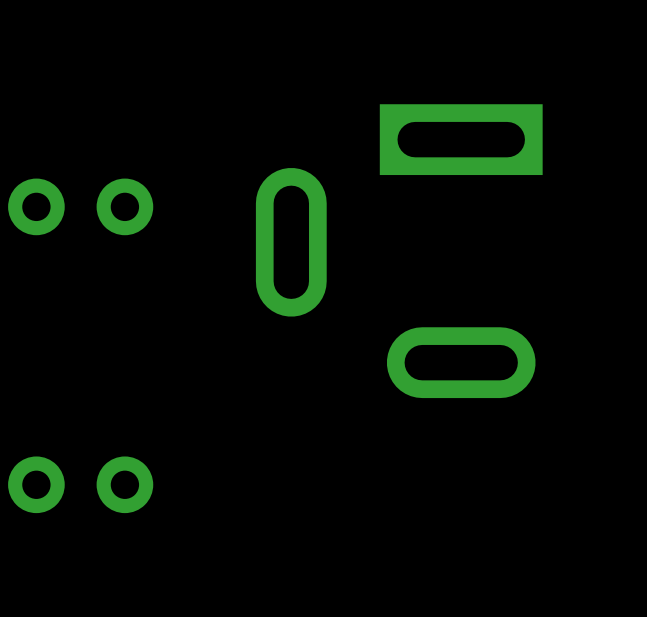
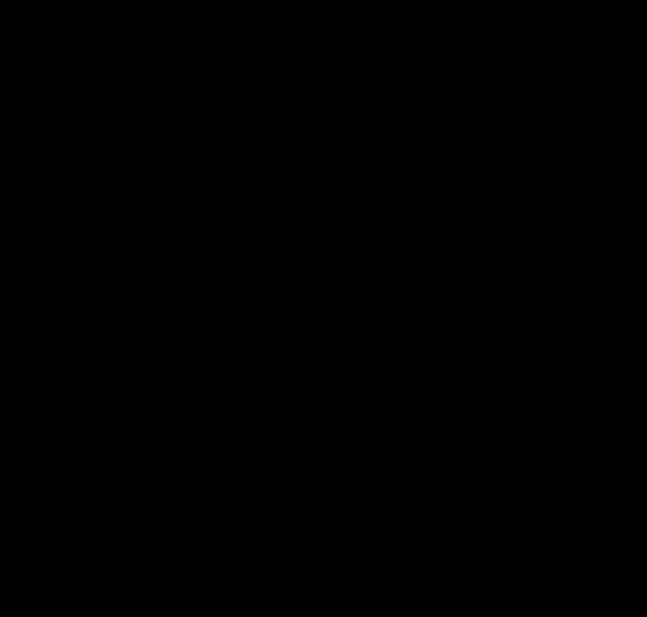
part: (80, 206) -> none
part: (399, 251) -> none
part: (80, 484) -> none

